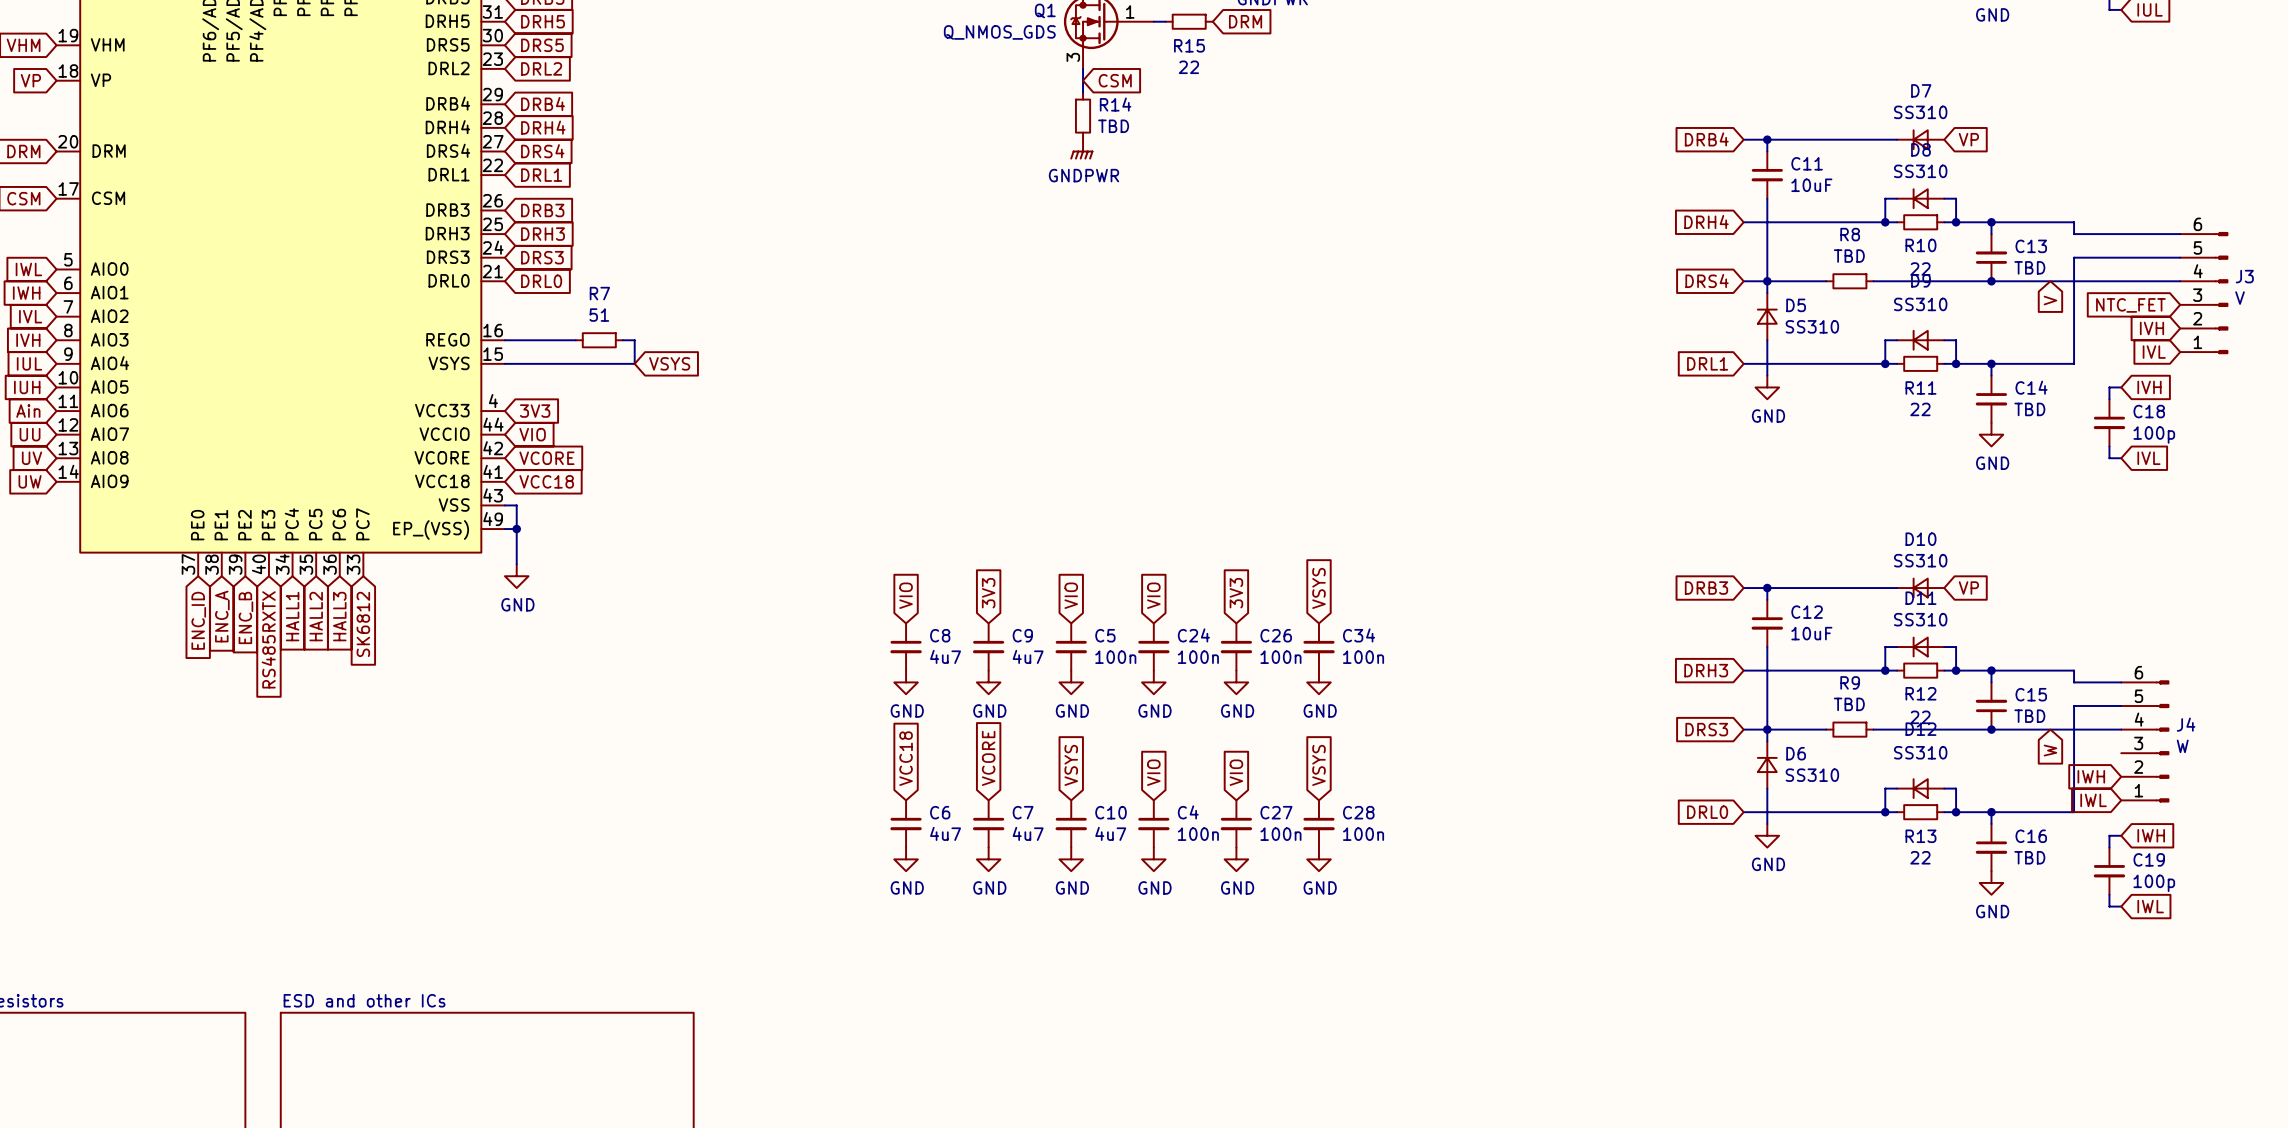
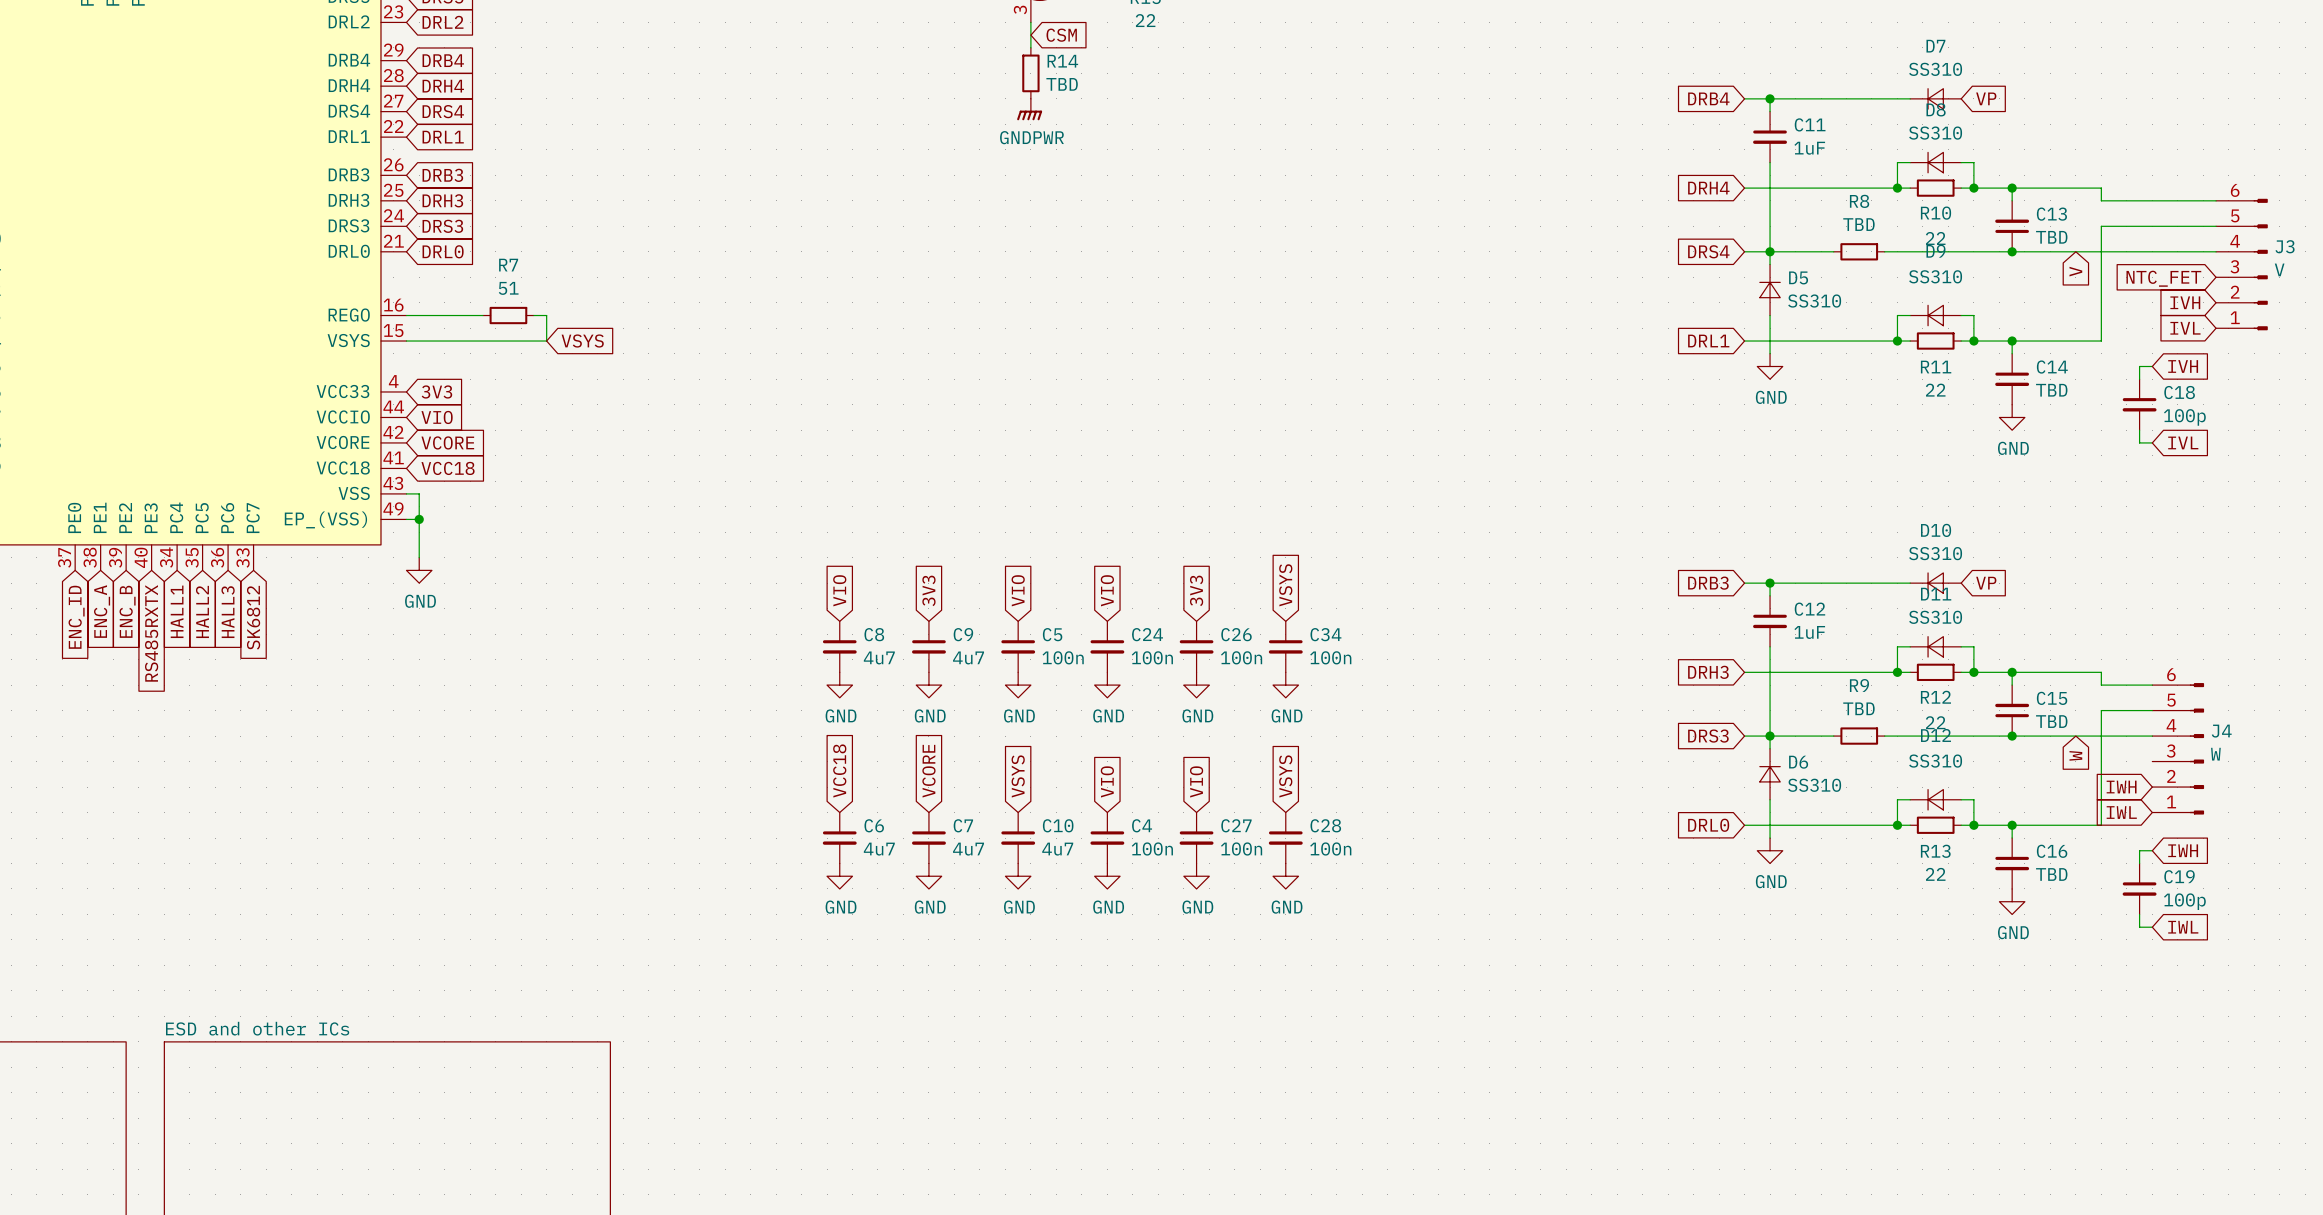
C11 value: 10uF (1811, 185) -> 1uF (1809, 148)
C12 value: 10uF (1811, 633) -> 1uF (1809, 632)

